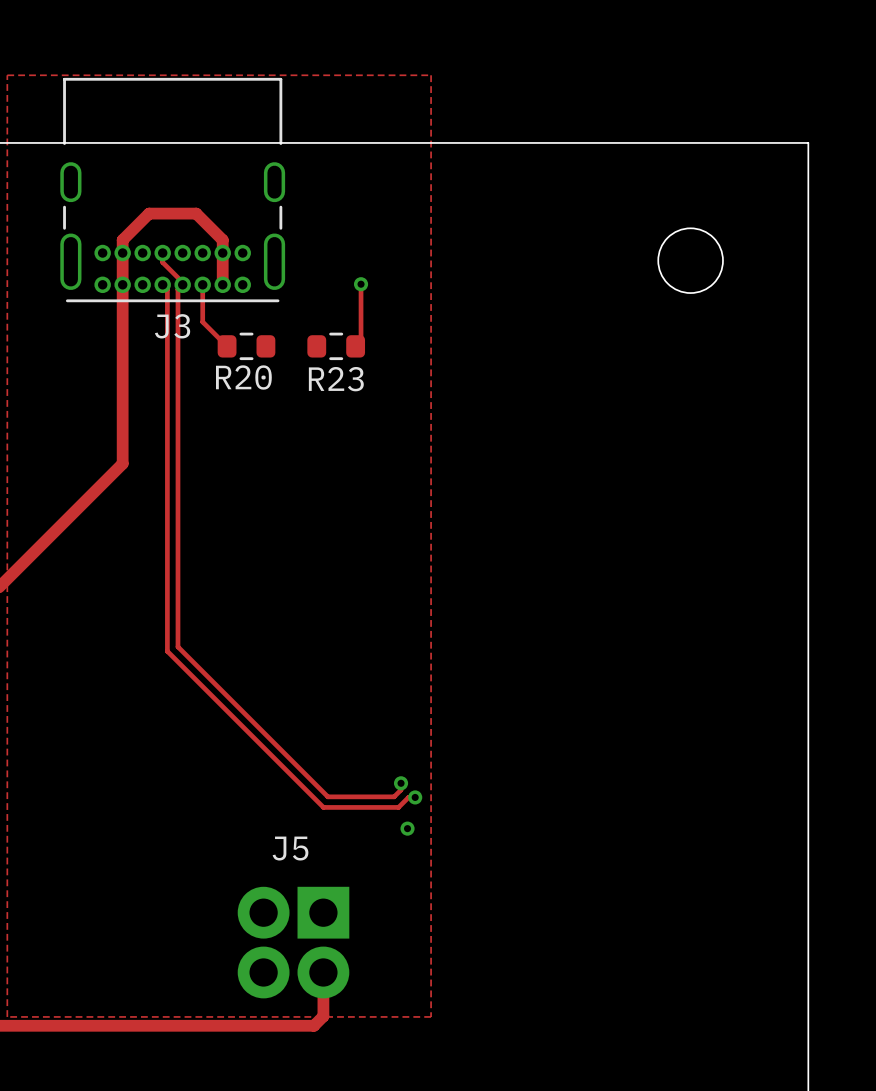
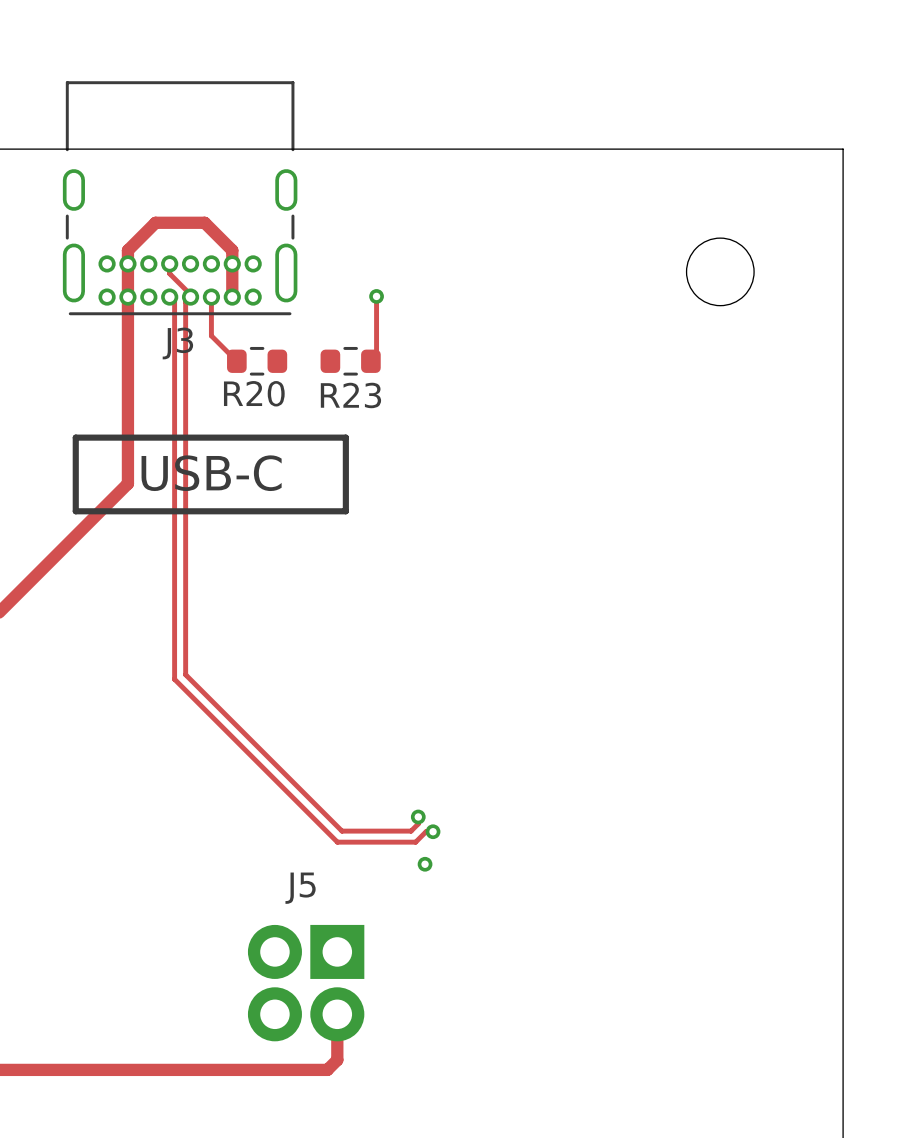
zone outline: (7, 75) (7, 1016) (431, 1016) (431, 75) (7, 75) -> none
line: none -> (75, 437) (345, 437) (345, 511) (75, 511) (75, 437)
text: none -> USB-C (211, 473)

